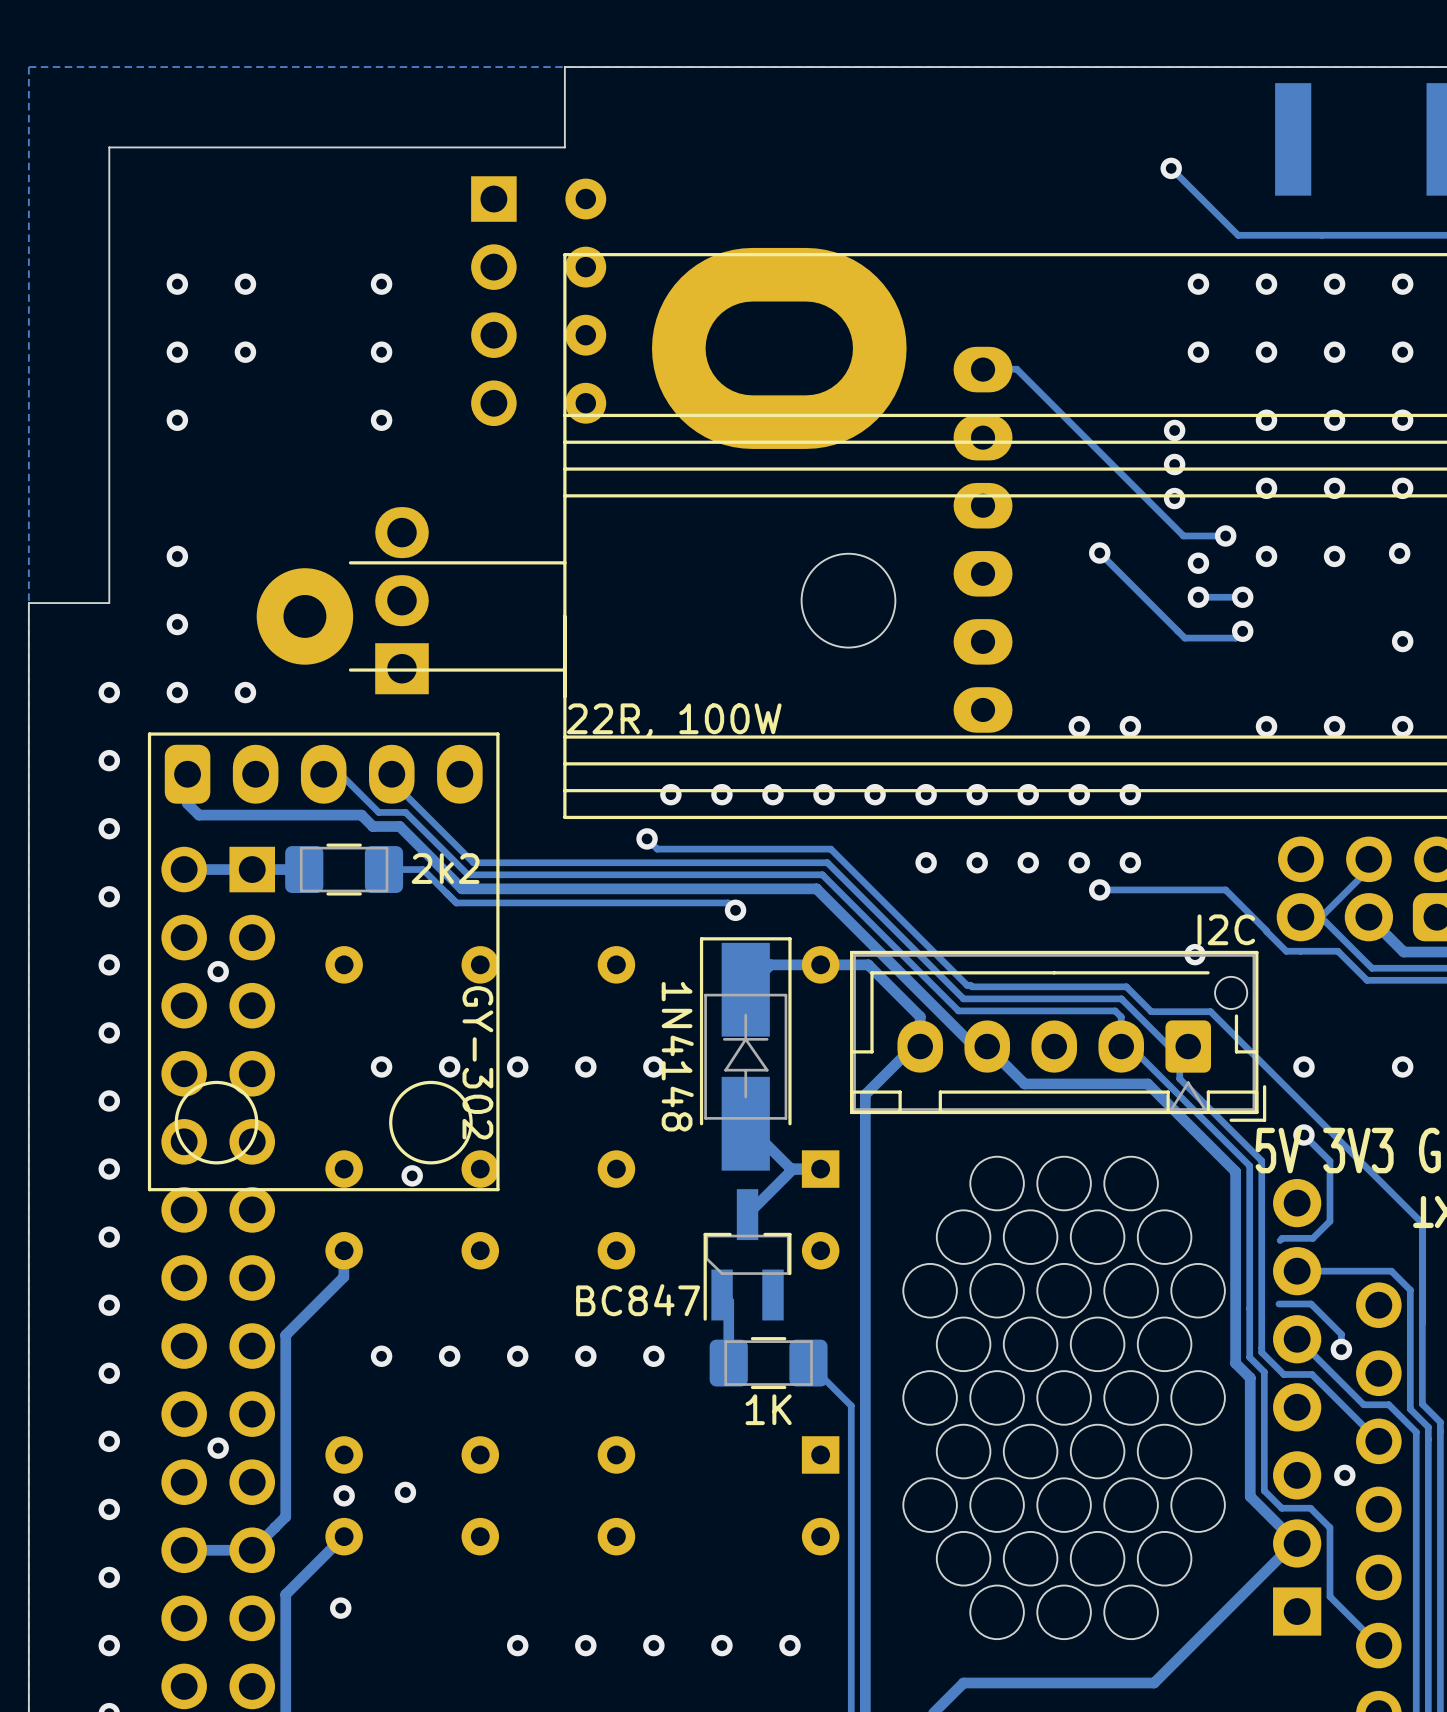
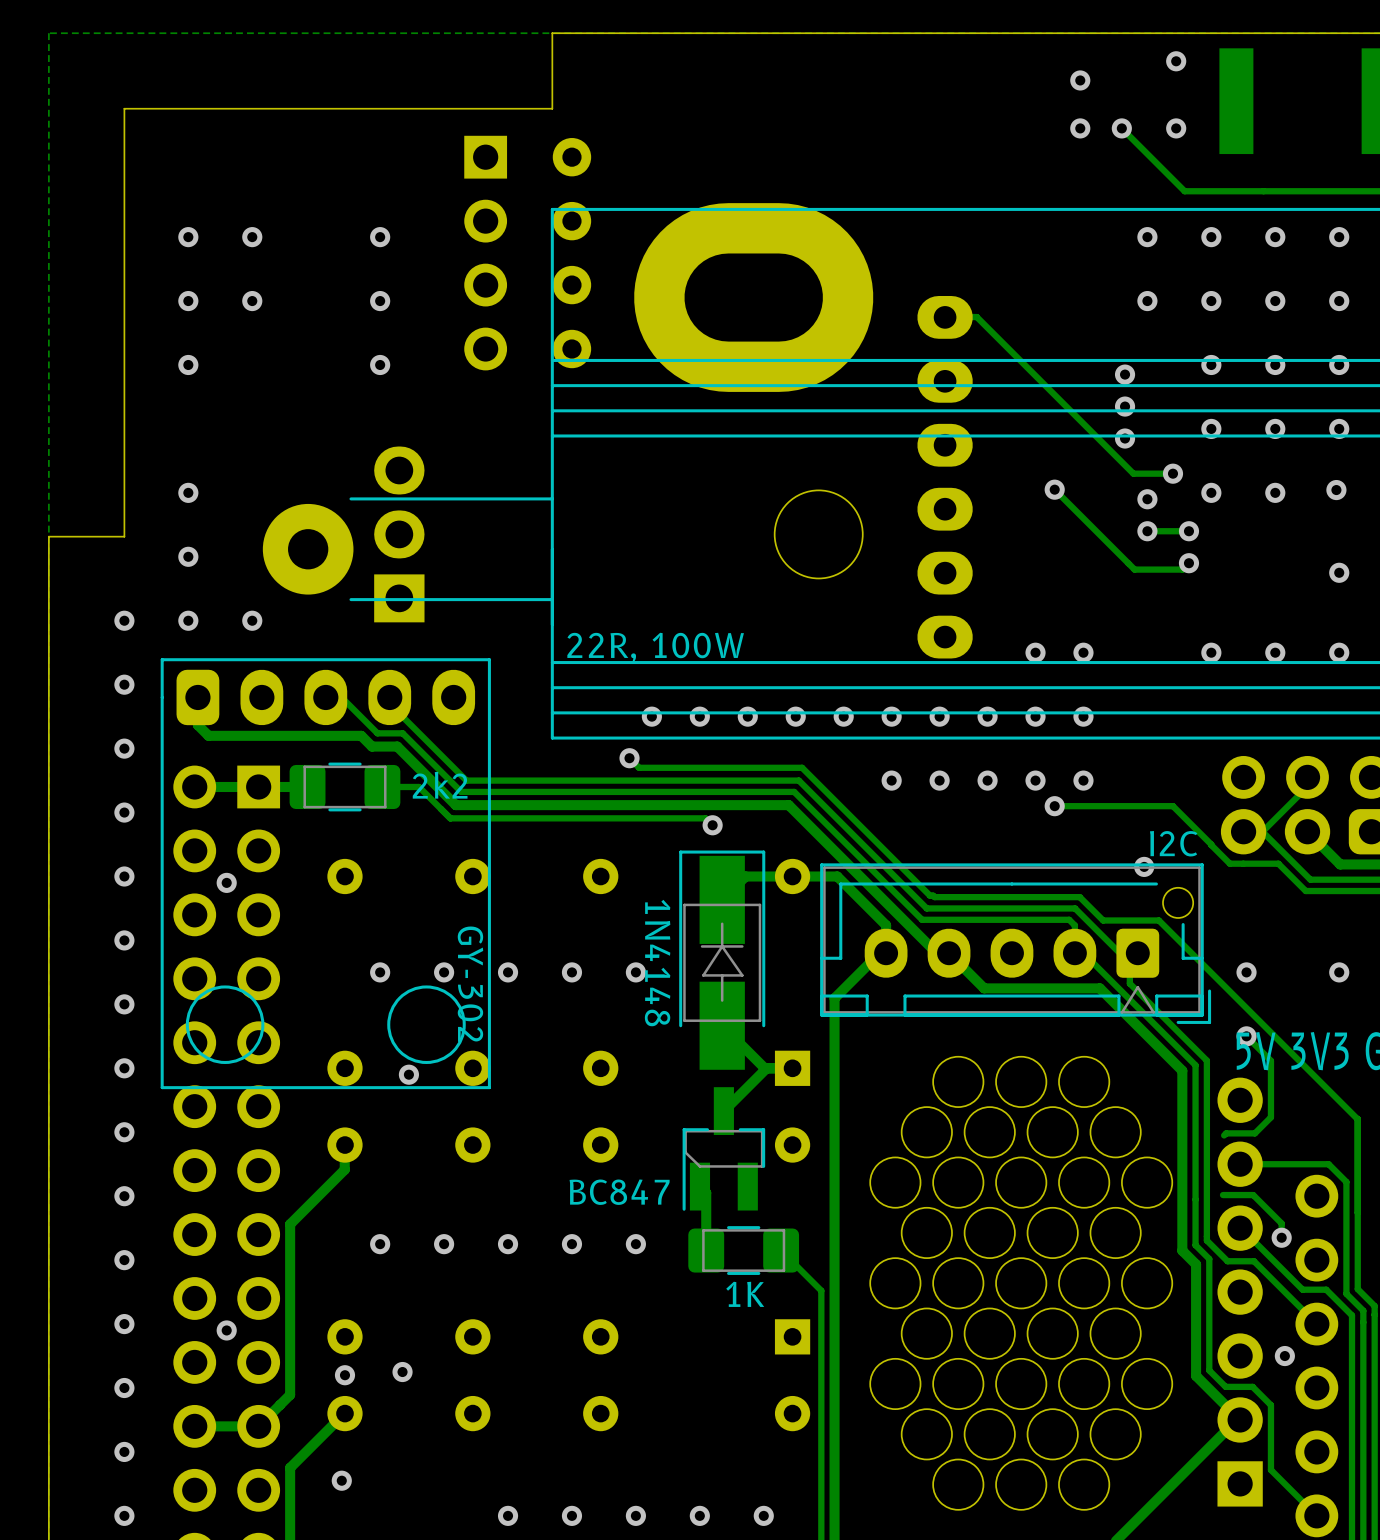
via: none -> (1176, 61)
via: none -> (1080, 80)
via: none -> (1080, 128)
via: none -> (1176, 128)

